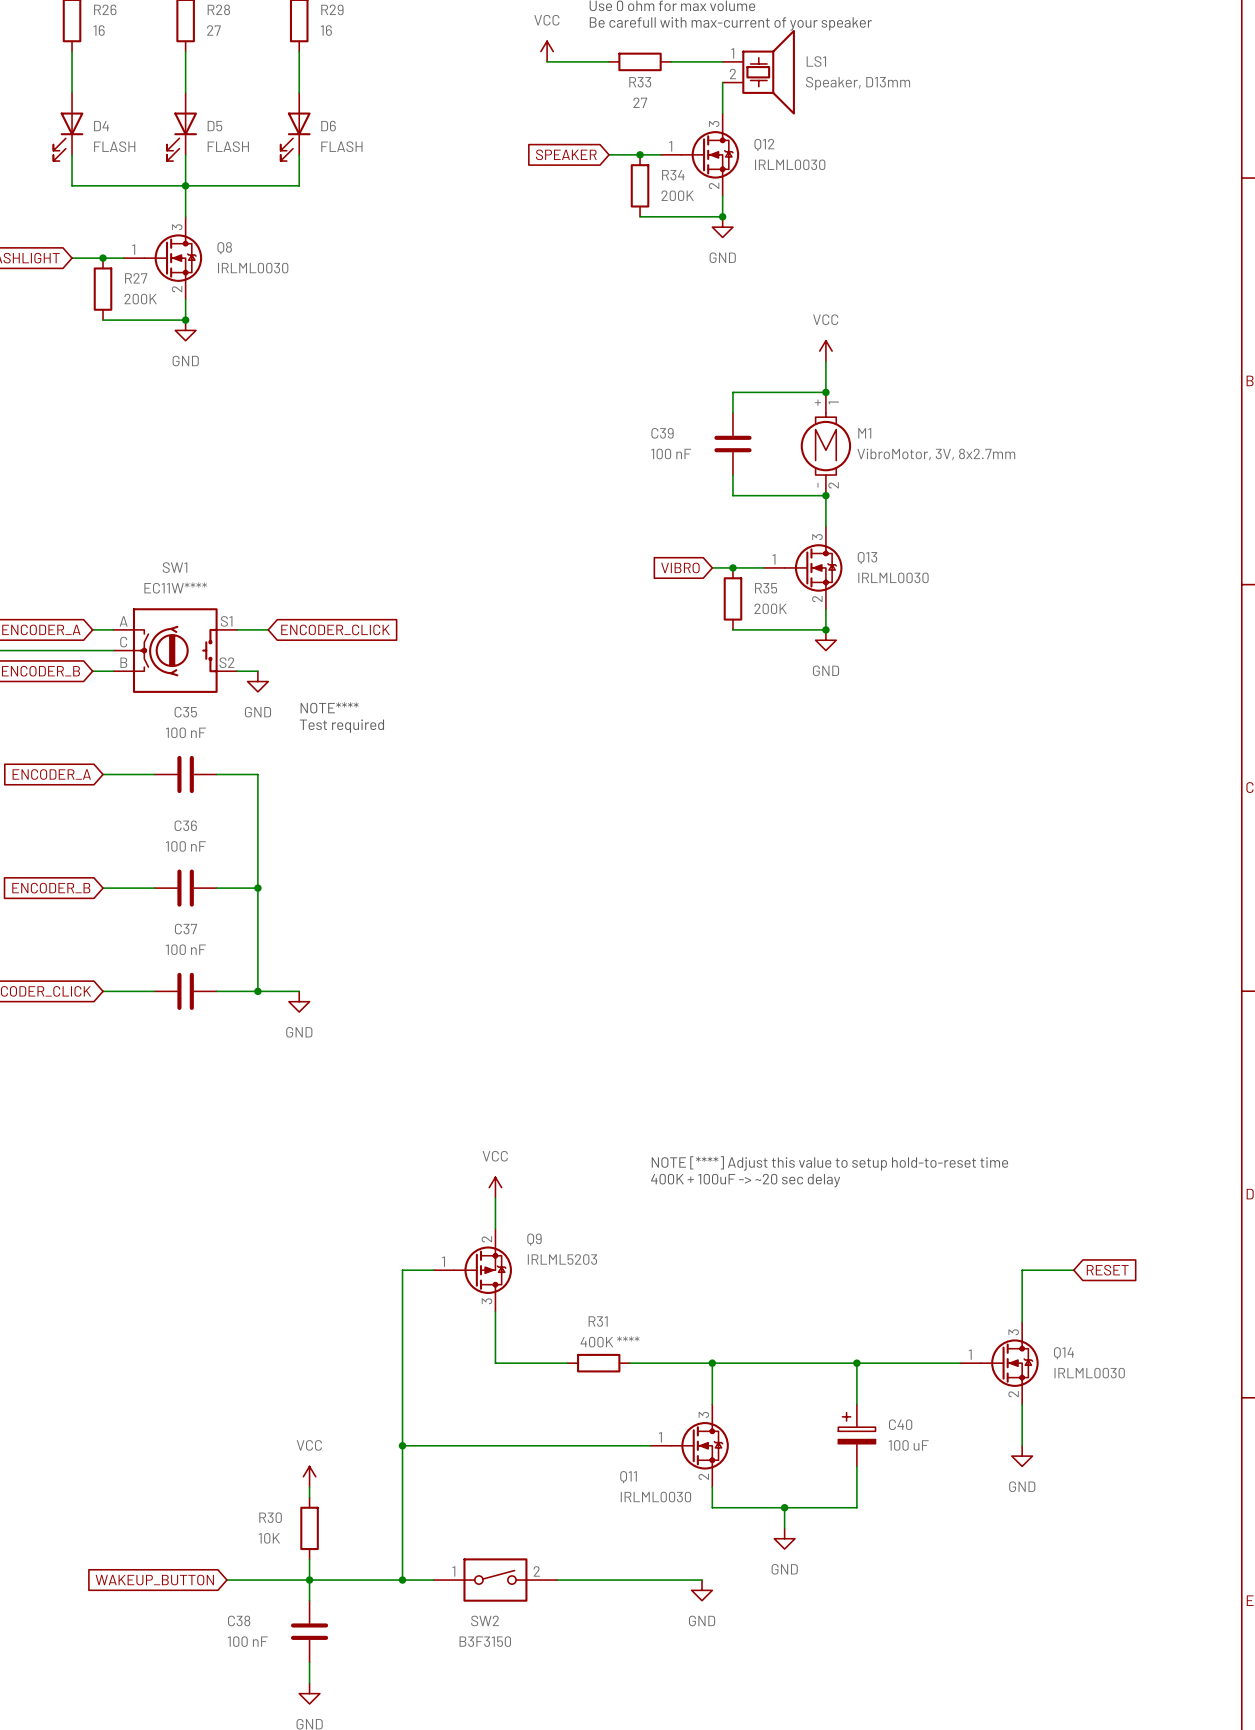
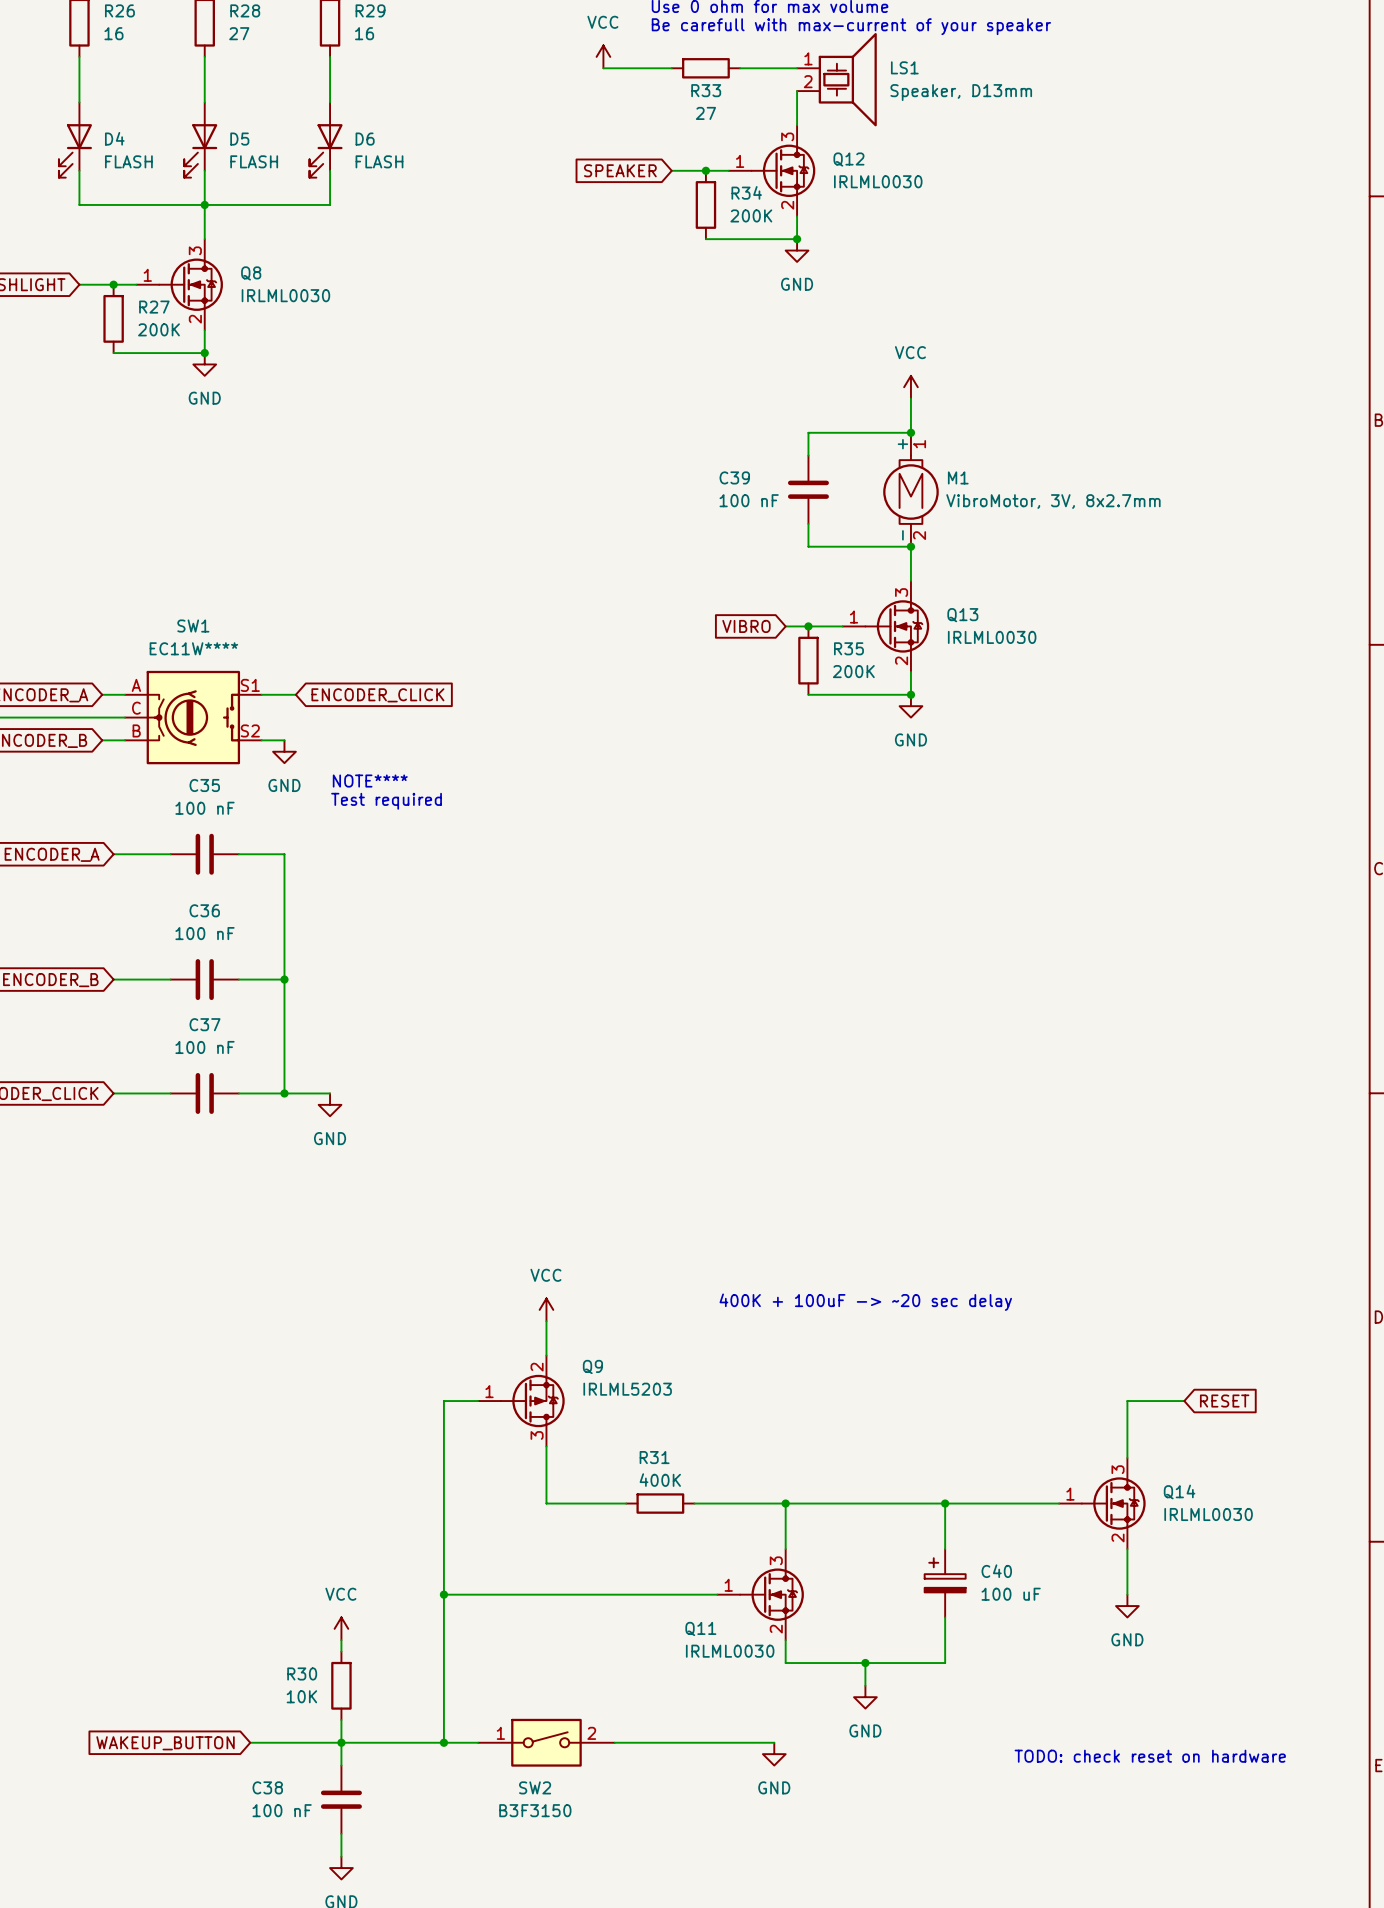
text: NOTE [****] Adjust this value to setup hold-to-reset time (829, 1163) -> none
R31 value: 400K **** (610, 1341) -> 400K (660, 1480)
text: none -> TODO: check reset on hardware (1150, 1756)

